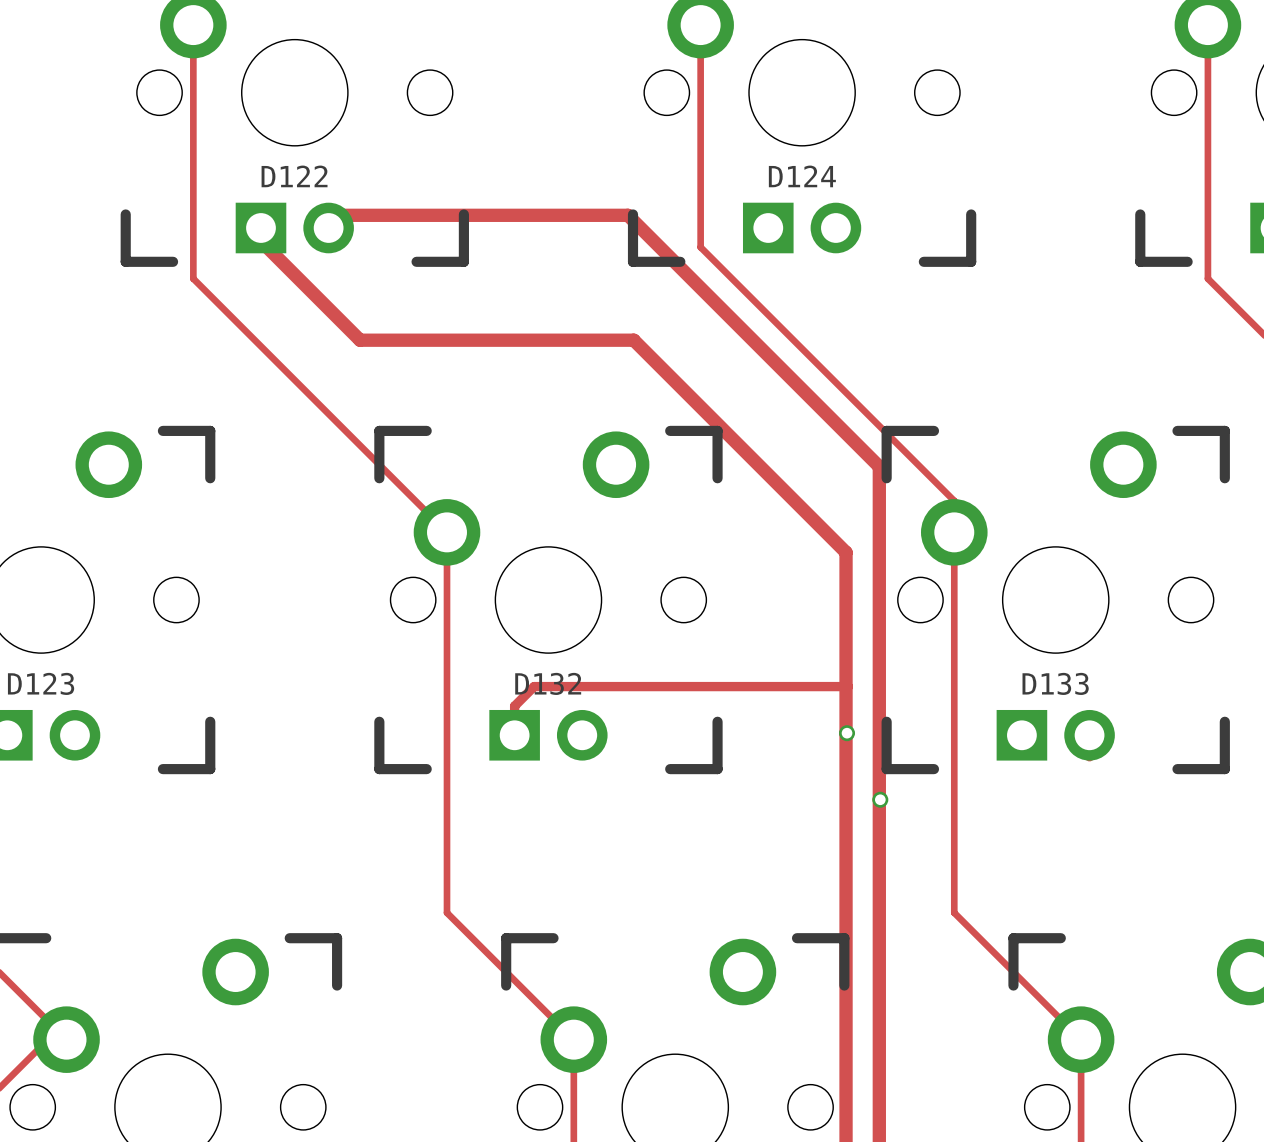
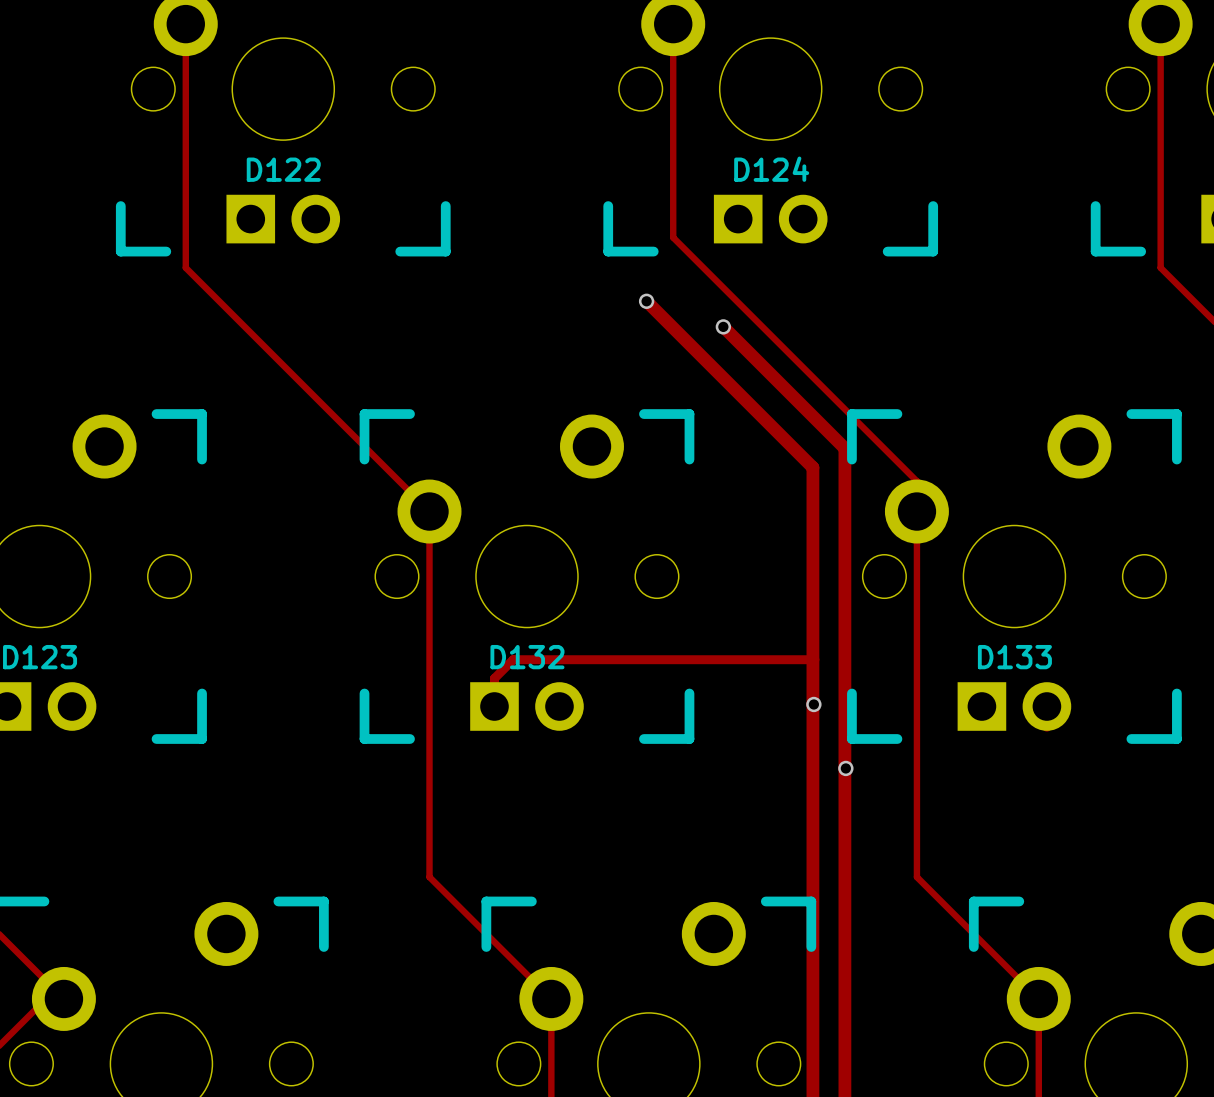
track: (328, 215) (627, 215) (752, 340) -> none
track: (260, 241) (360, 340) (633, 340) (846, 552) -> (646, 301) (812, 467) (812, 530)
via: none -> (646, 301)
via: none -> (723, 326)

